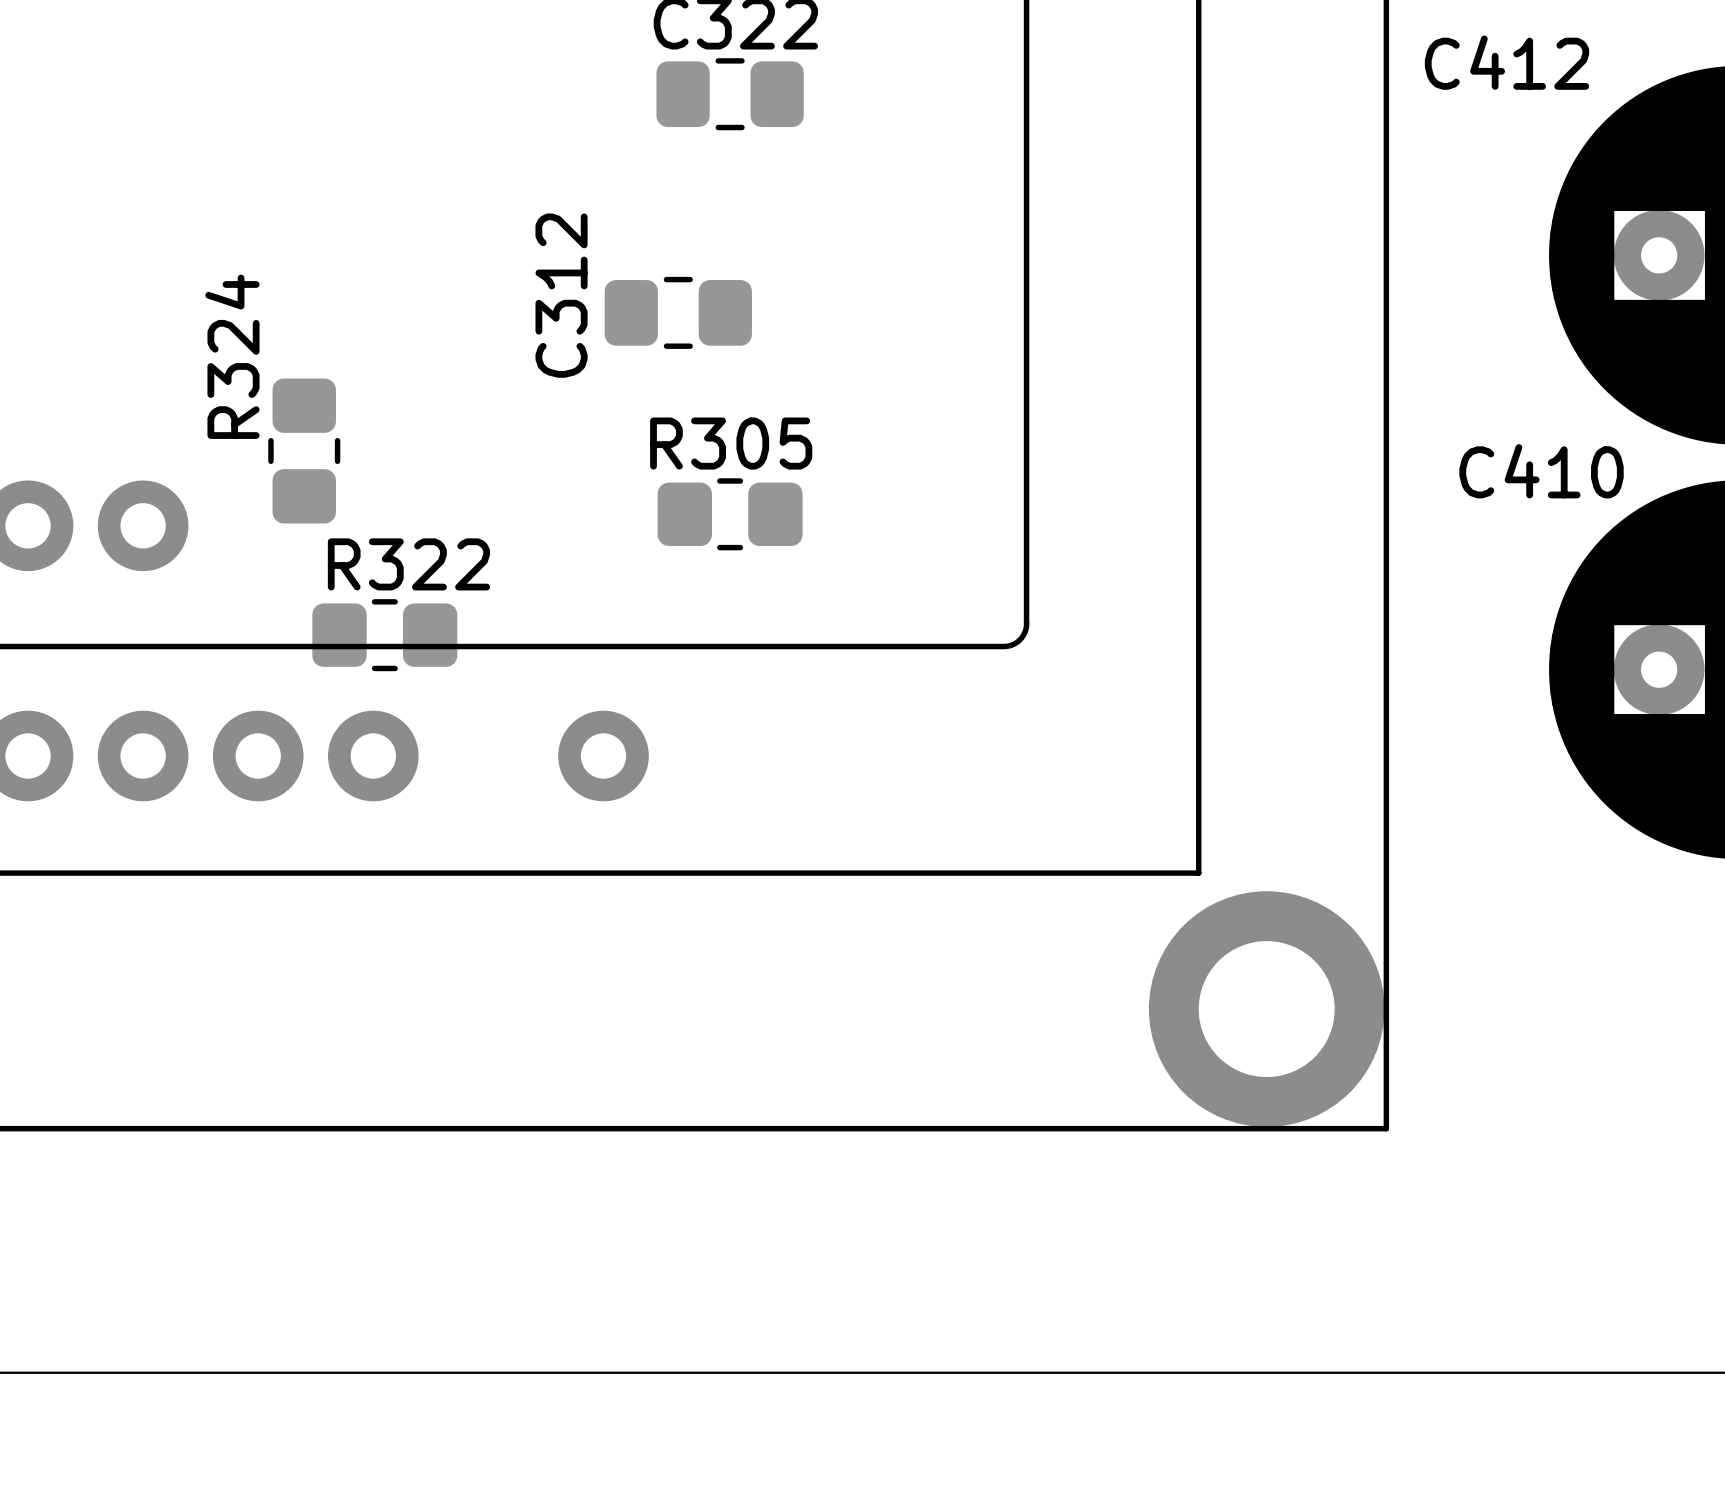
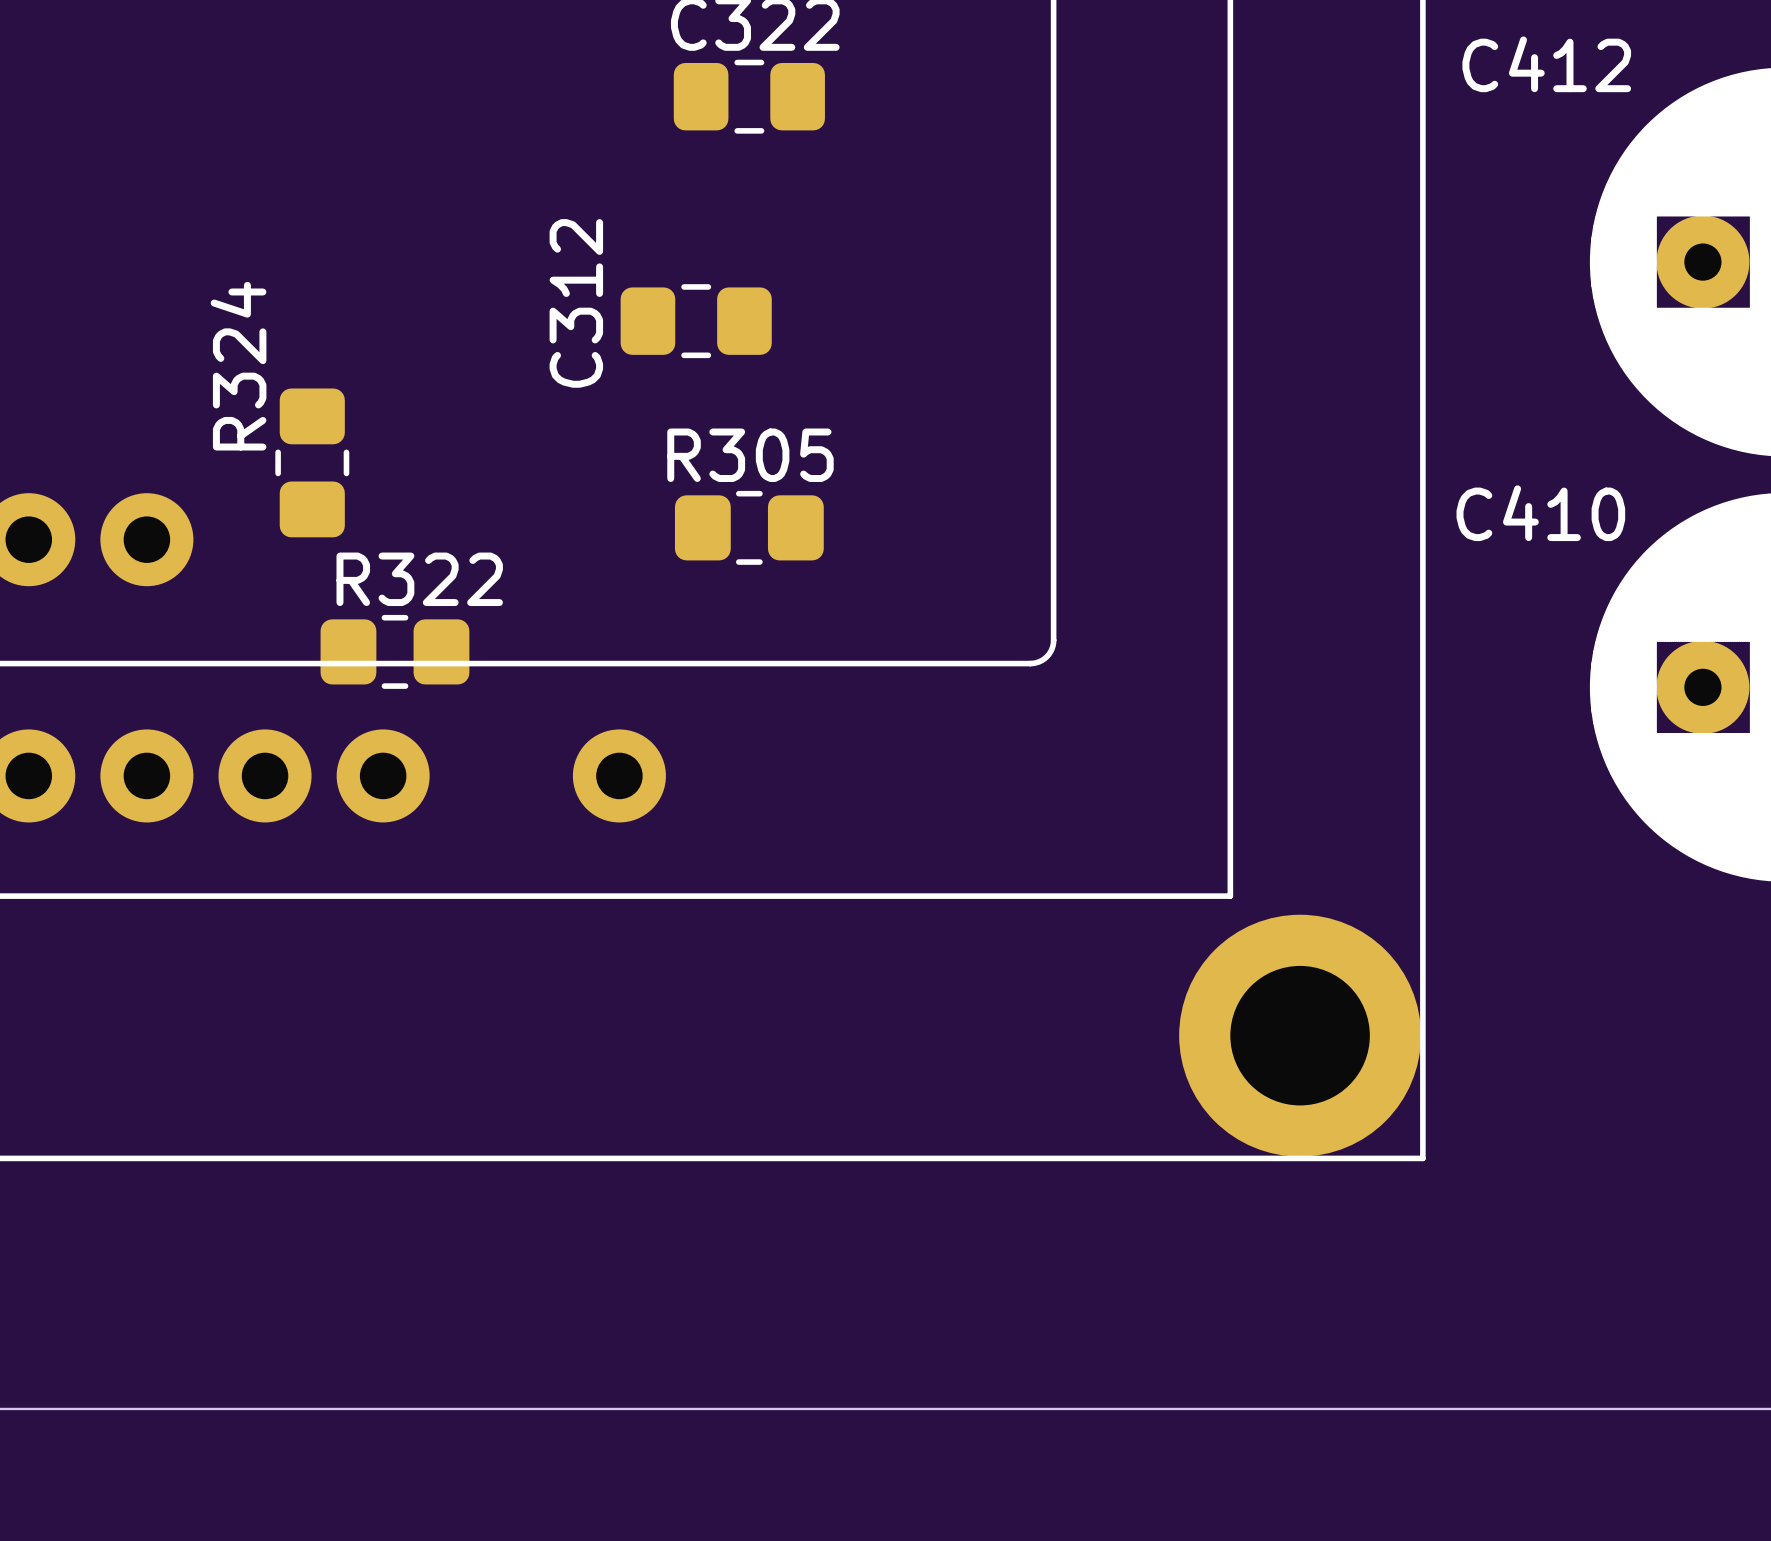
C410 name position: C410 (1541, 471) -> C410 (1540, 513)

